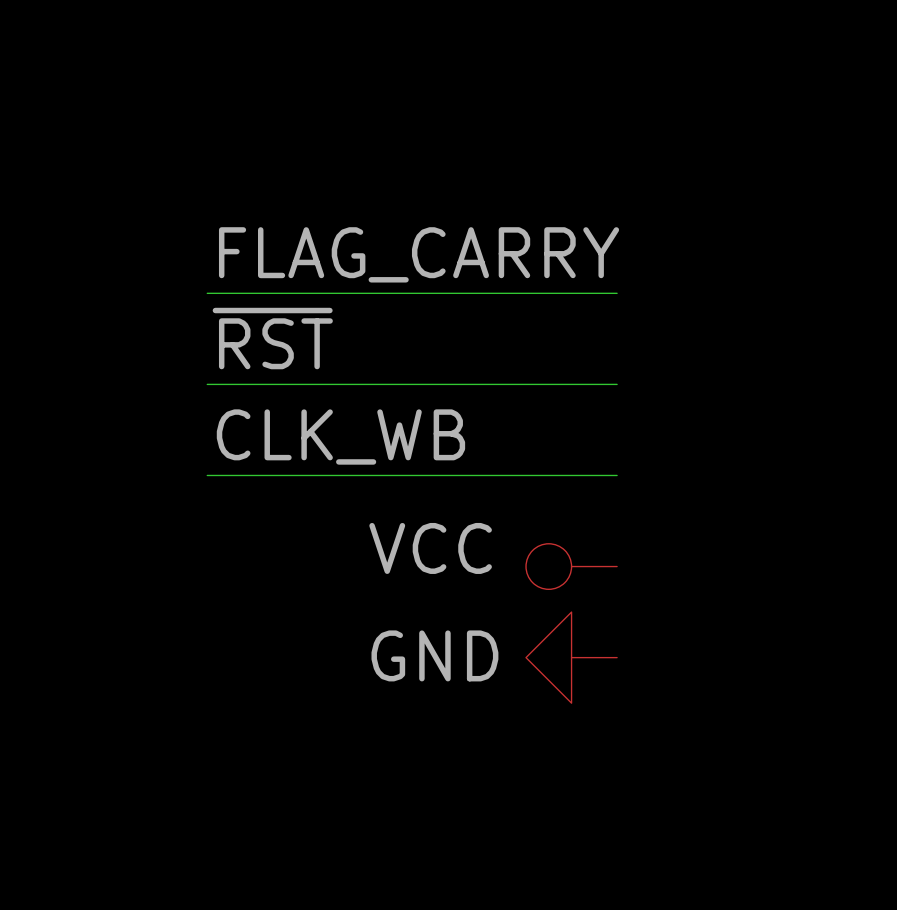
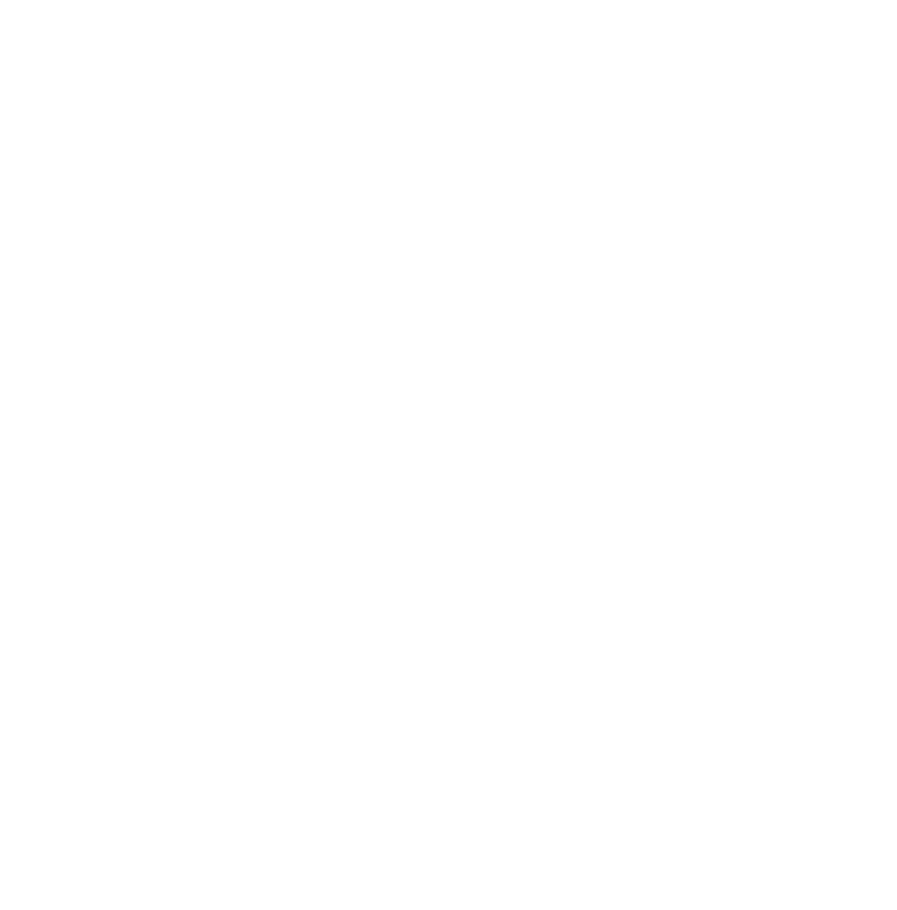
label: FLAG_CARRY (419, 254) -> none
wire: (207, 293) (617, 293) -> none
label: ~{RST} (272, 338) -> none
wire: (207, 384) (617, 384) -> none
label: CLK_WB (340, 437) -> none
wire: (207, 475) (617, 475) -> none
power symbol: VCC (571, 566) -> none
power symbol: GND (571, 657) -> none

